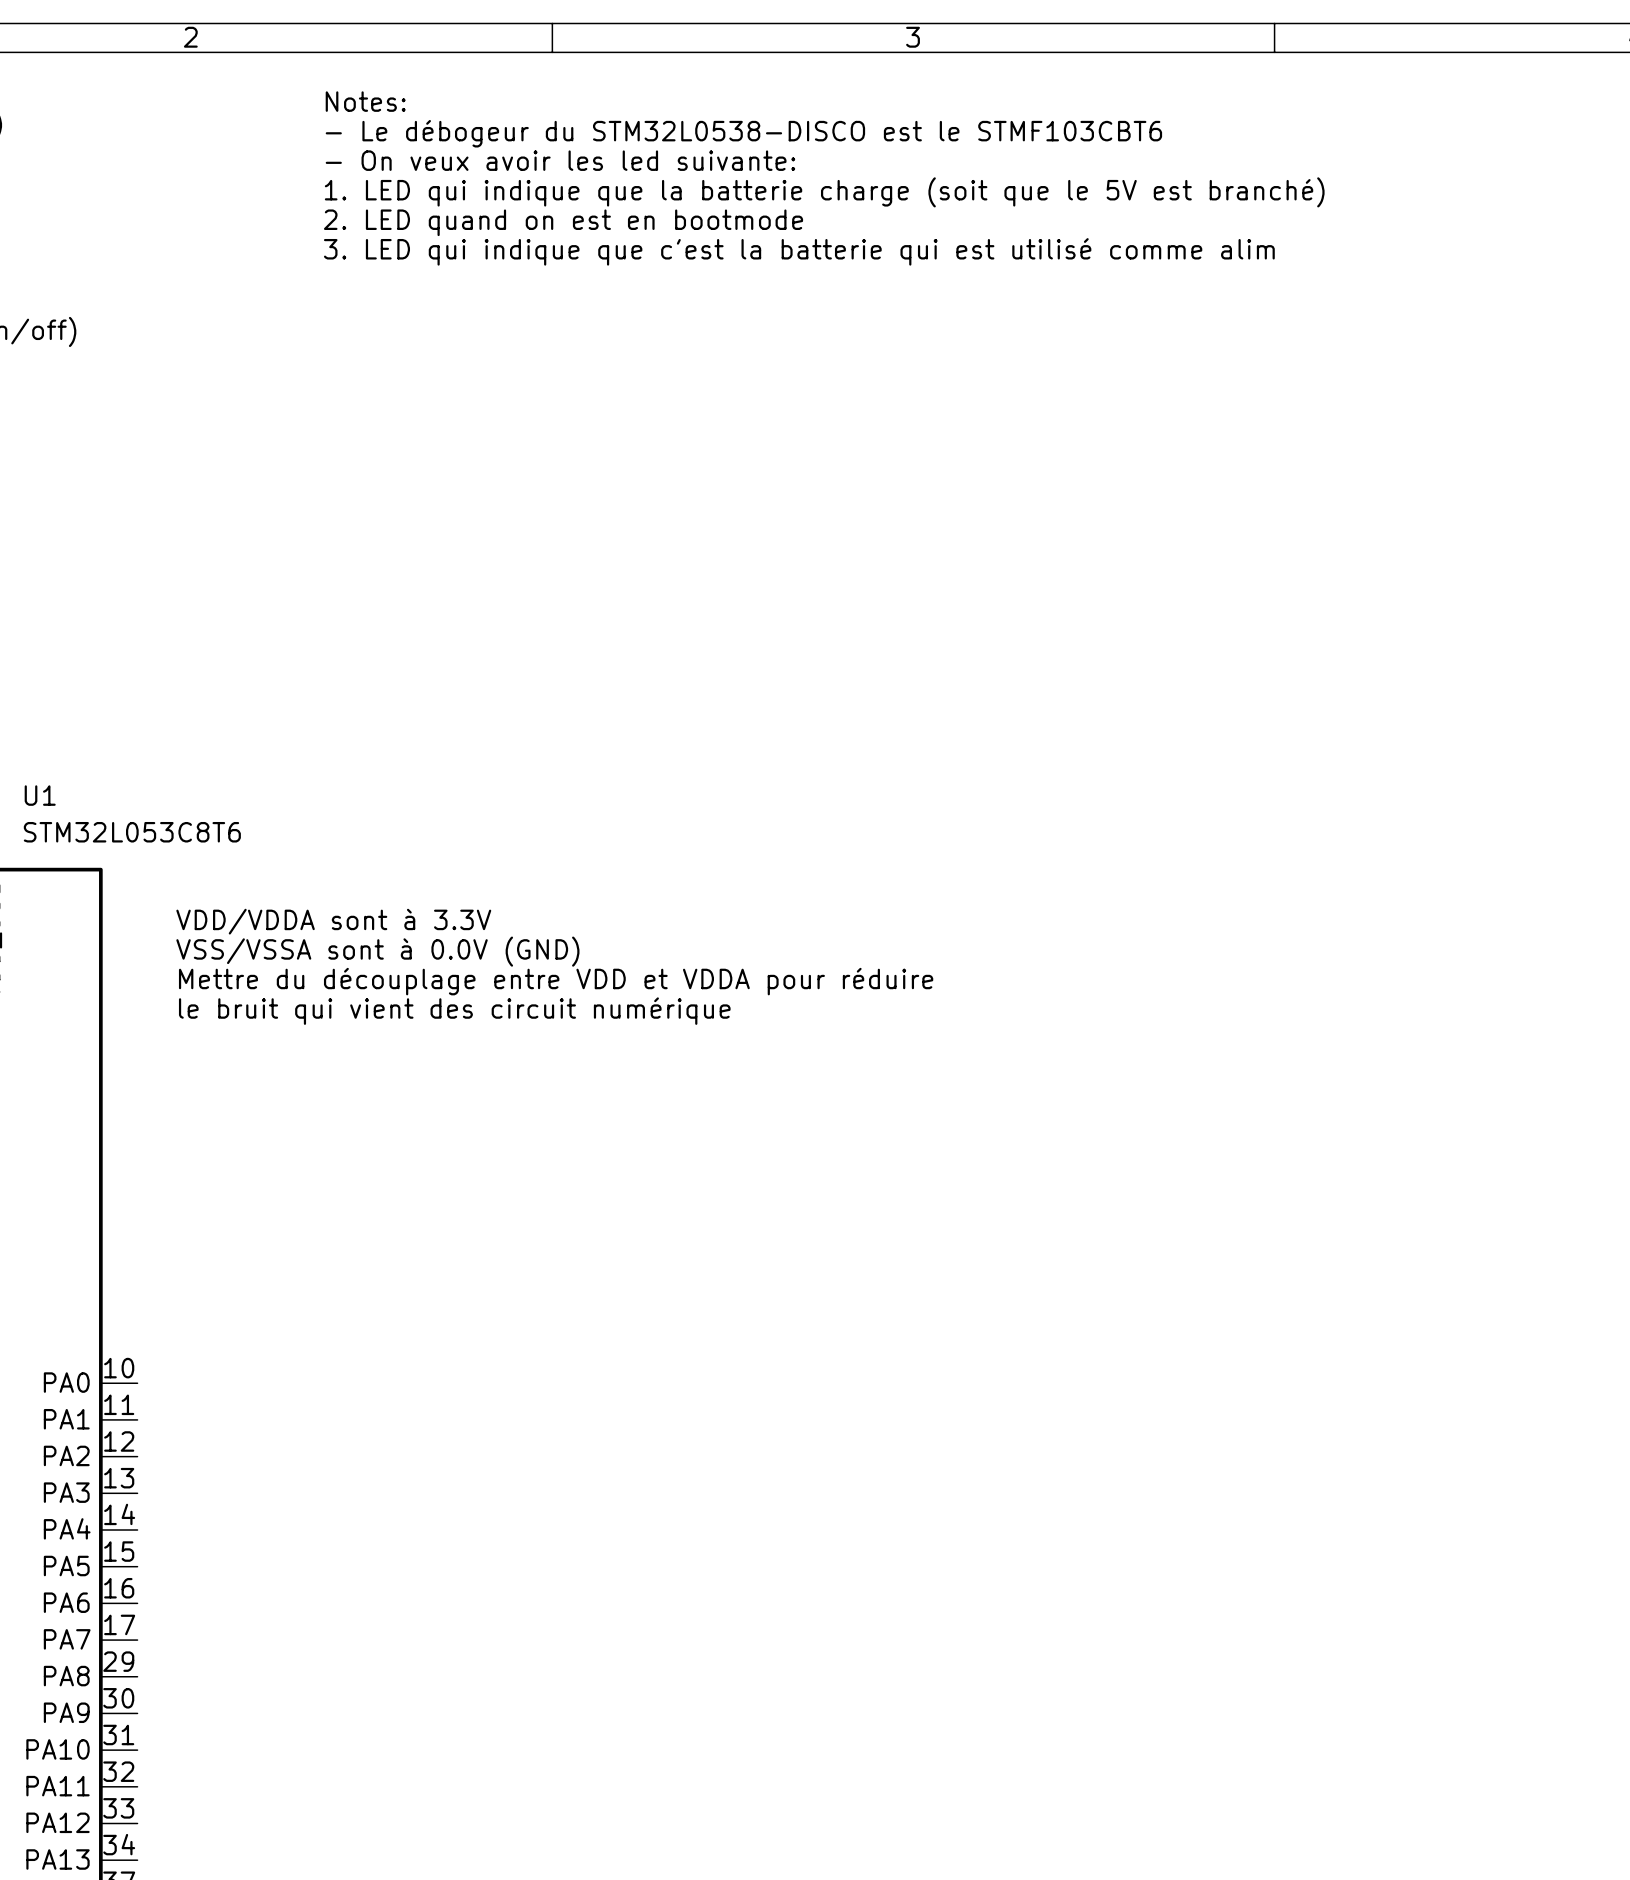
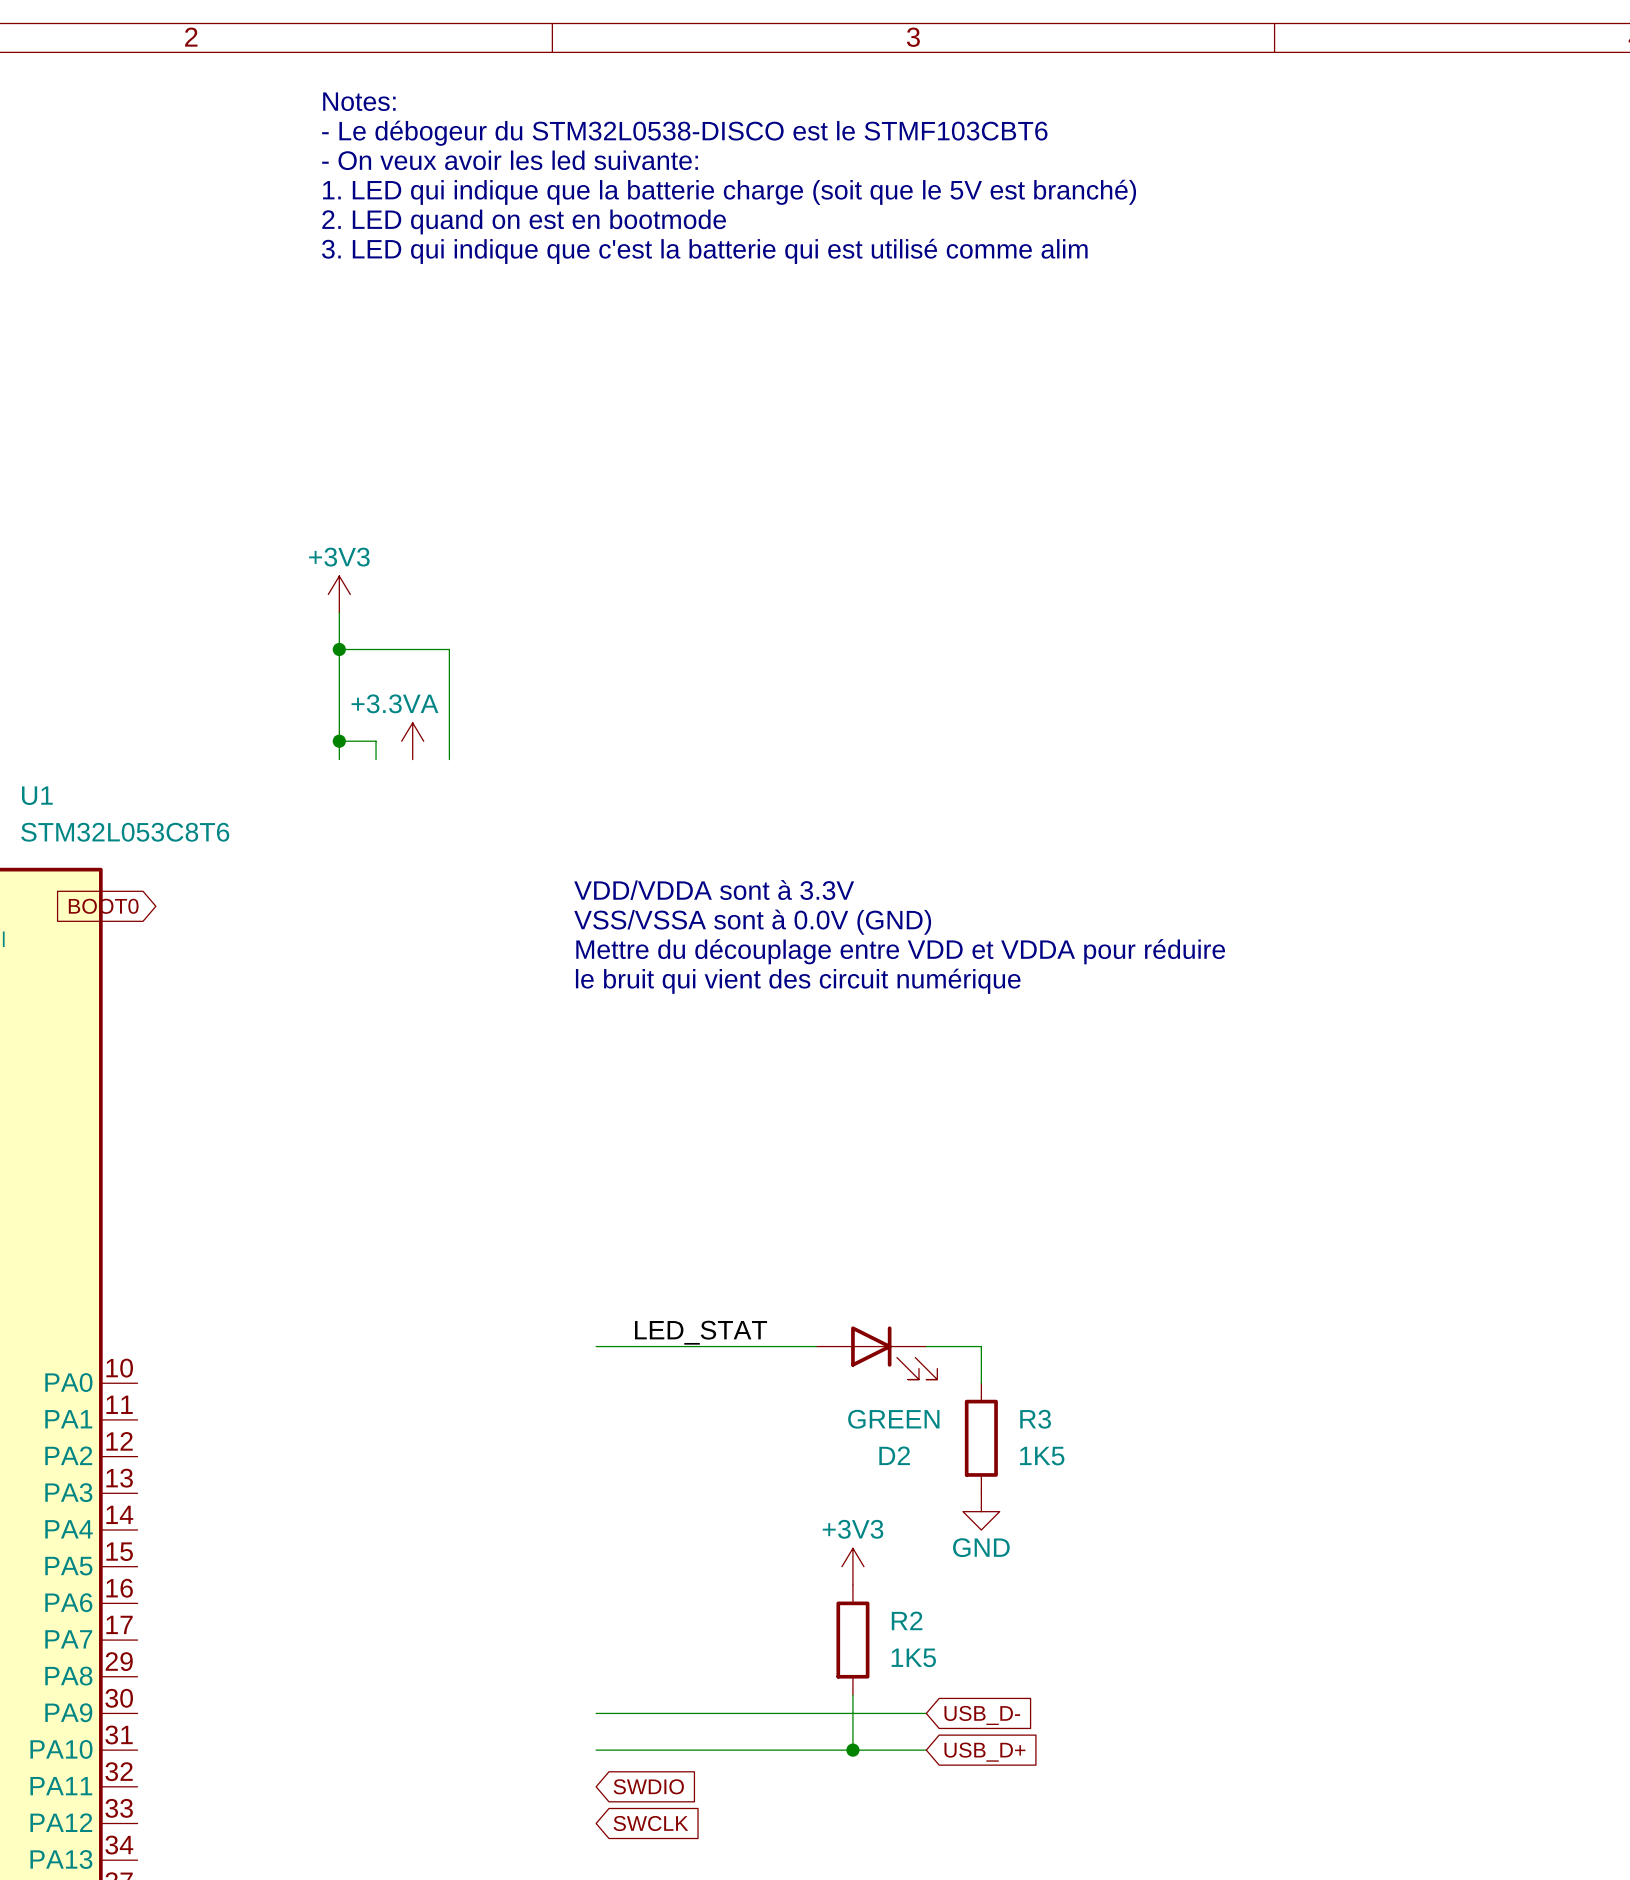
power symbol: none -> +3V3 (339, 594)
wire: none -> (339, 612) (339, 759)
wire: none -> (339, 649) (449, 649) (449, 759)
junction: none -> (339, 649)
wire: none -> (339, 741) (376, 741) (376, 759)
junction: none -> (339, 741)
power symbol: none -> +3.3VA (412, 741)
text: none -> VDD/VDDA sont à 3.3V (714, 890)
global label: none -> BOOT0 (103, 906)
text: VDD/VDDA sont à 3.3V (333, 921) -> none
text: none -> VSS/VSSA sont à 0.0V (GND) (752, 922)
text: VSS/VSSA sont à 0.0V (GND) (377, 951) -> none
text: none -> Mettre du découplage entre VDD et VDDA pour réduire (900, 951)
text: Mettre du découplage entre VDD et VDDA pour réduire (556, 981) -> none
text: none -> le bruit qui vient des circuit numérique (798, 981)
text: le bruit qui vient des circuit numérique (454, 1011) -> none
label: none -> LED_STAT (701, 1332)
wire: none -> (596, 1346) (816, 1346)
wire: none -> (926, 1346) (981, 1346) (981, 1383)
D2: none -> GREEN (876, 1352)
R3: none -> 1K5 (981, 1438)
power symbol: none -> GND (981, 1511)
power symbol: none -> +3V3 (852, 1566)
R2: none -> 1K5 (852, 1640)
wire: none -> (852, 1695) (852, 1750)
wire: none -> (596, 1713) (926, 1713)
global label: none -> USB_D- (982, 1715)
wire: none -> (596, 1750) (926, 1750)
junction: none -> (852, 1750)
global label: none -> USB_D+ (984, 1752)
global label: none -> SWDIO (648, 1786)
global label: none -> SWCLK (650, 1823)

